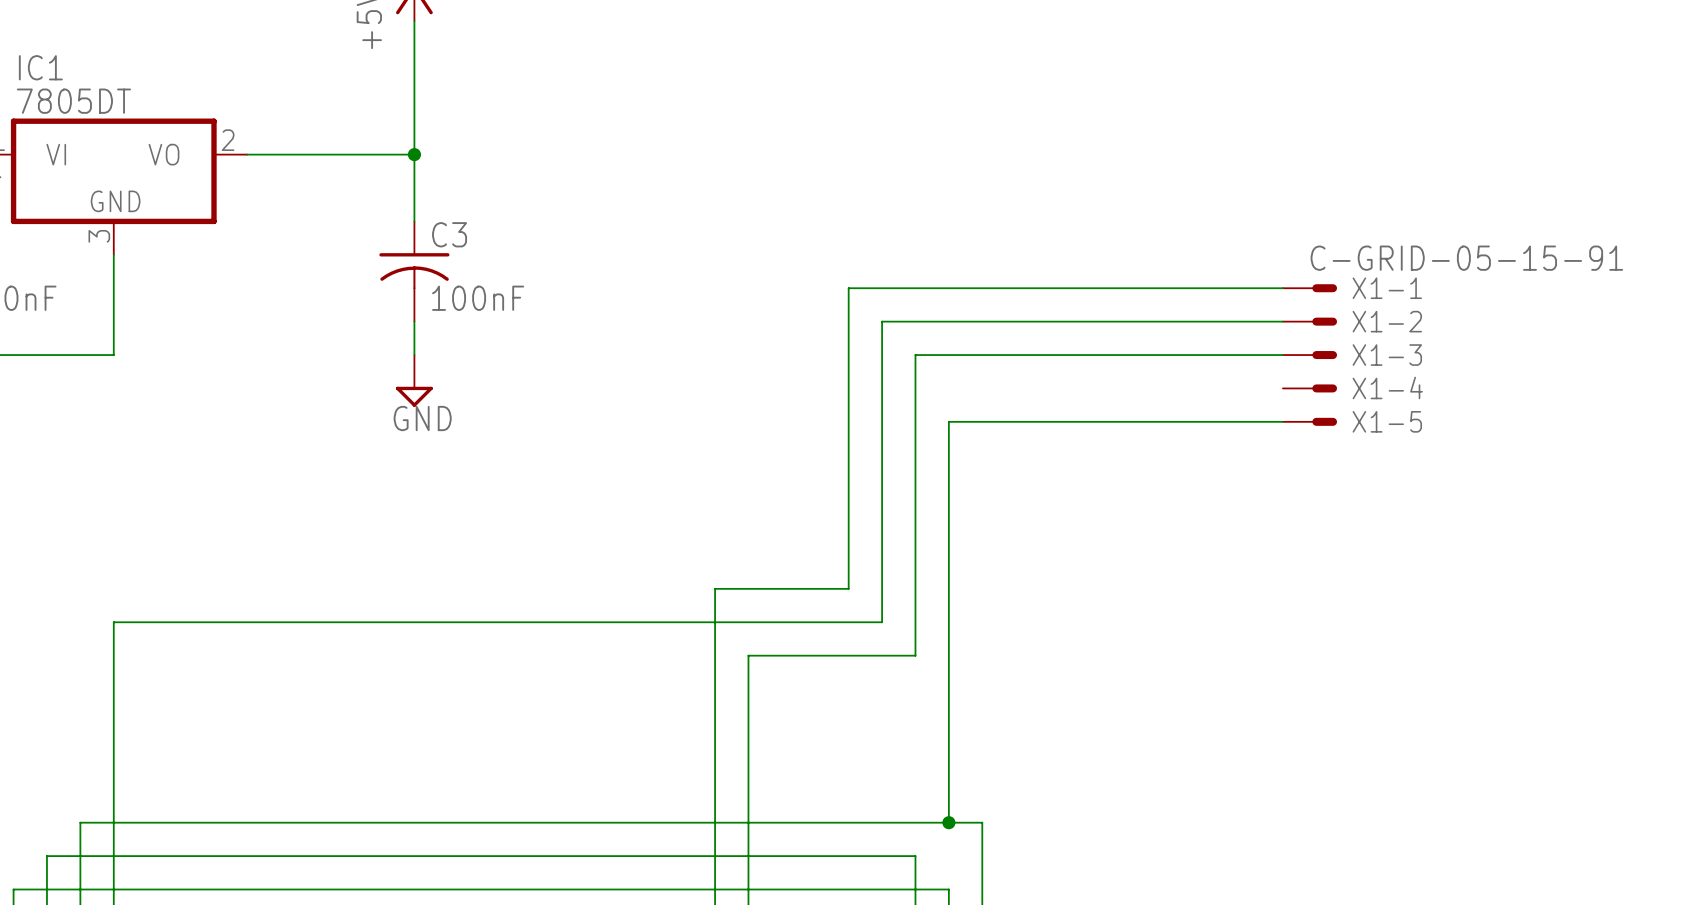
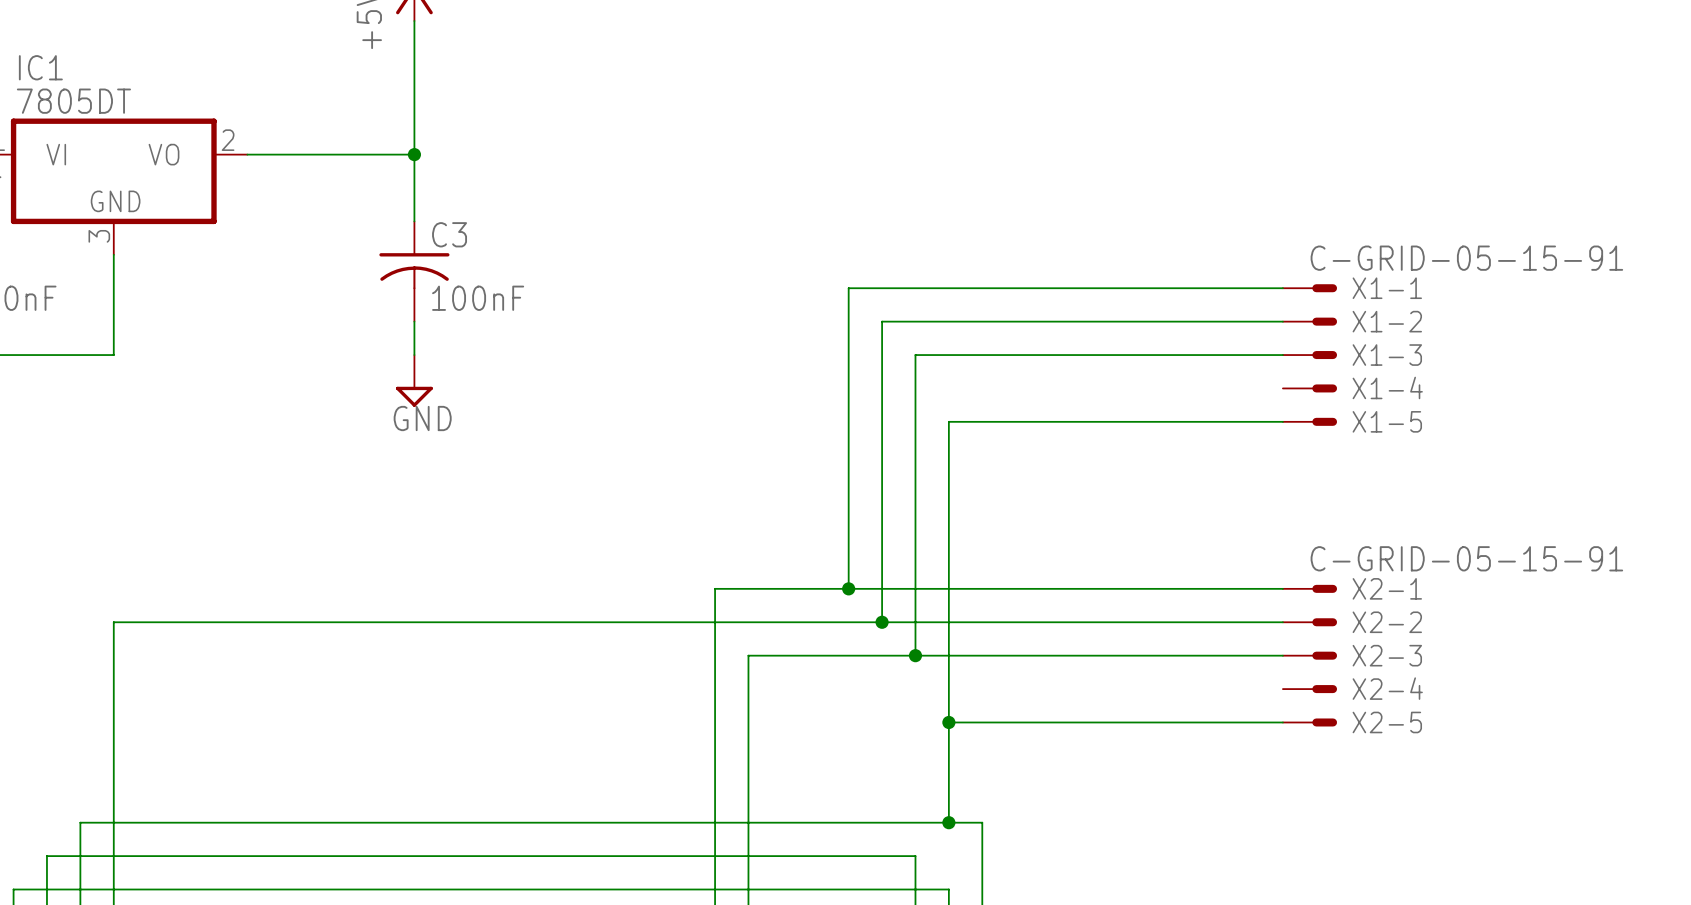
wire: none -> (848, 588) (1282, 588)
junction: none -> (848, 588)
X2-1: none -> C-GRID-05-15-91 (1309, 588)
wire: none -> (882, 622) (1282, 622)
junction: none -> (882, 622)
X2-2: none -> (1309, 622)
wire: none -> (915, 655) (1282, 655)
junction: none -> (915, 655)
X2-3: none -> (1309, 655)
X2-4: none -> (1309, 689)
wire: none -> (948, 722) (1282, 722)
junction: none -> (948, 722)
X2-5: none -> (1309, 722)

